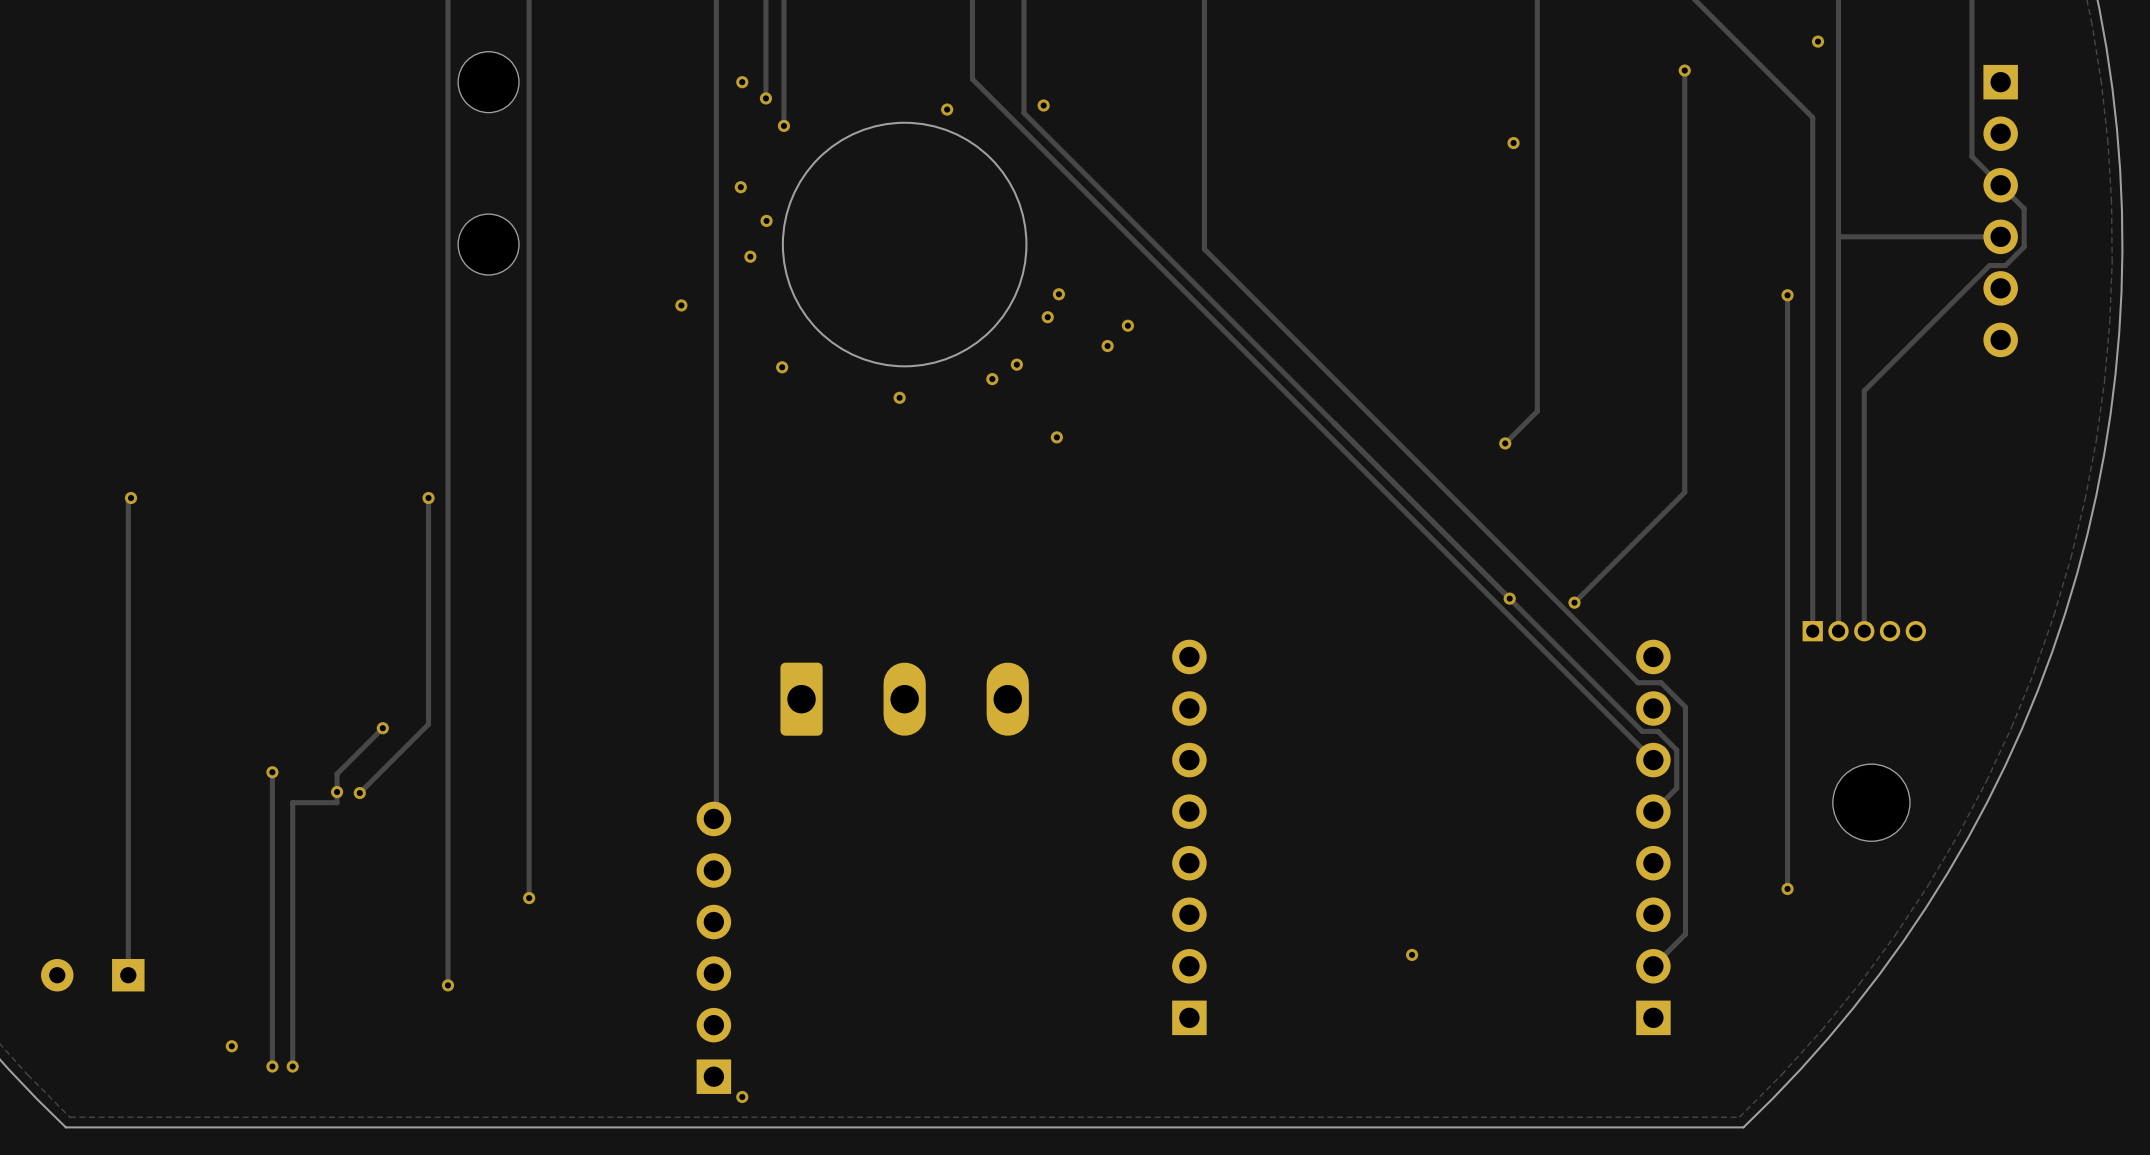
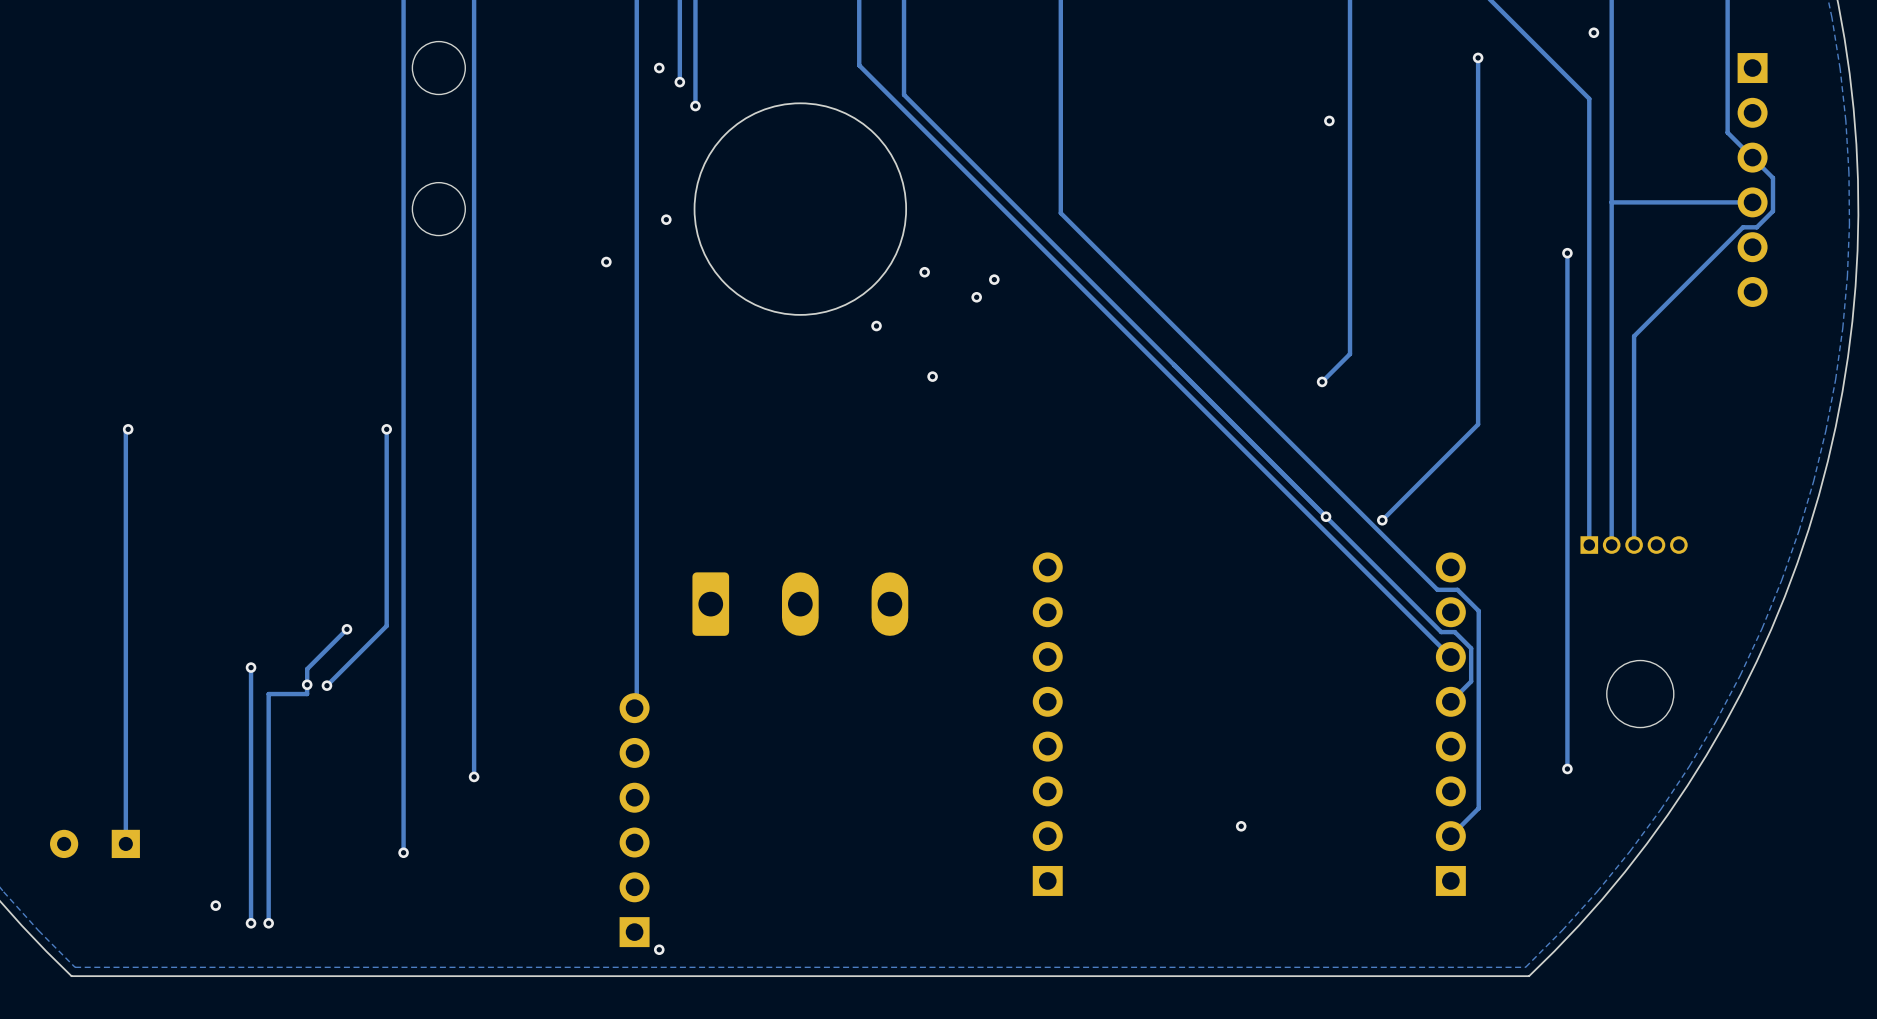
via: (1043, 105) -> none
via: (947, 109) -> none
via: (740, 187) -> none
via: (766, 220) -> none
via: (1058, 294) -> none
via: (1016, 364) -> none
via: (782, 367) -> none
via: (899, 397) -> none

